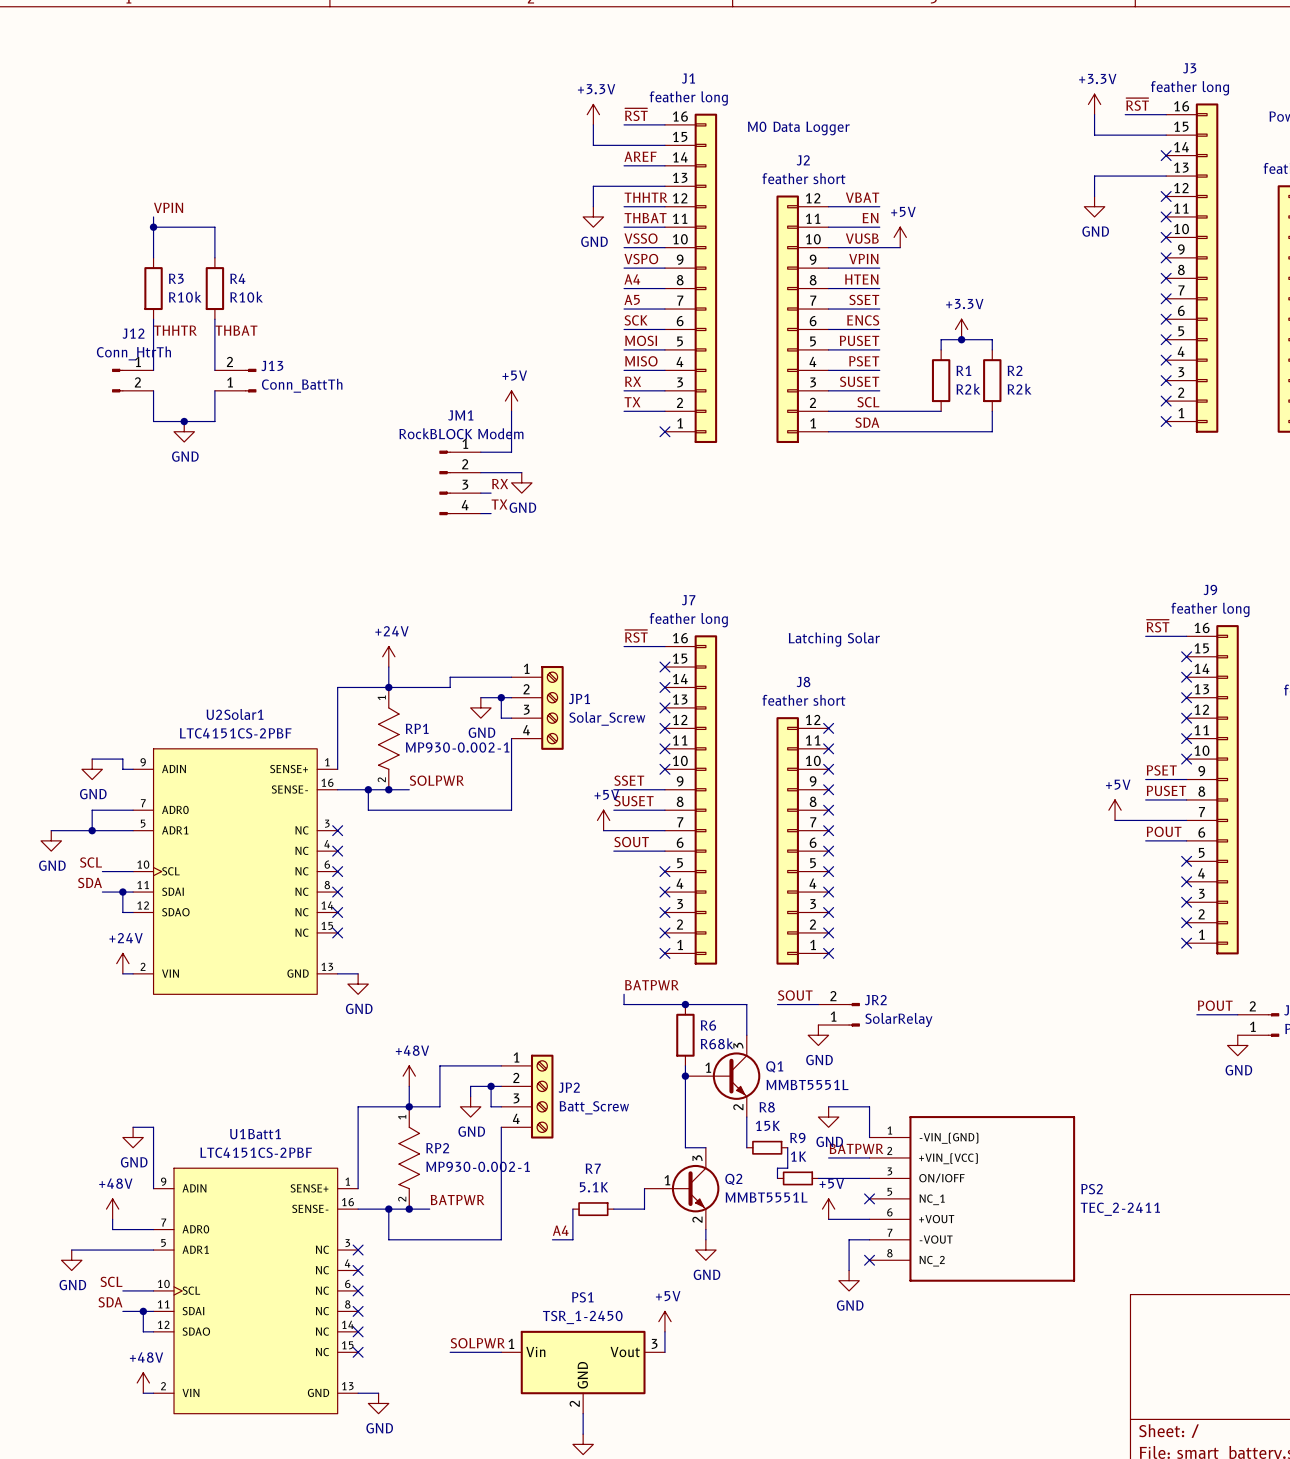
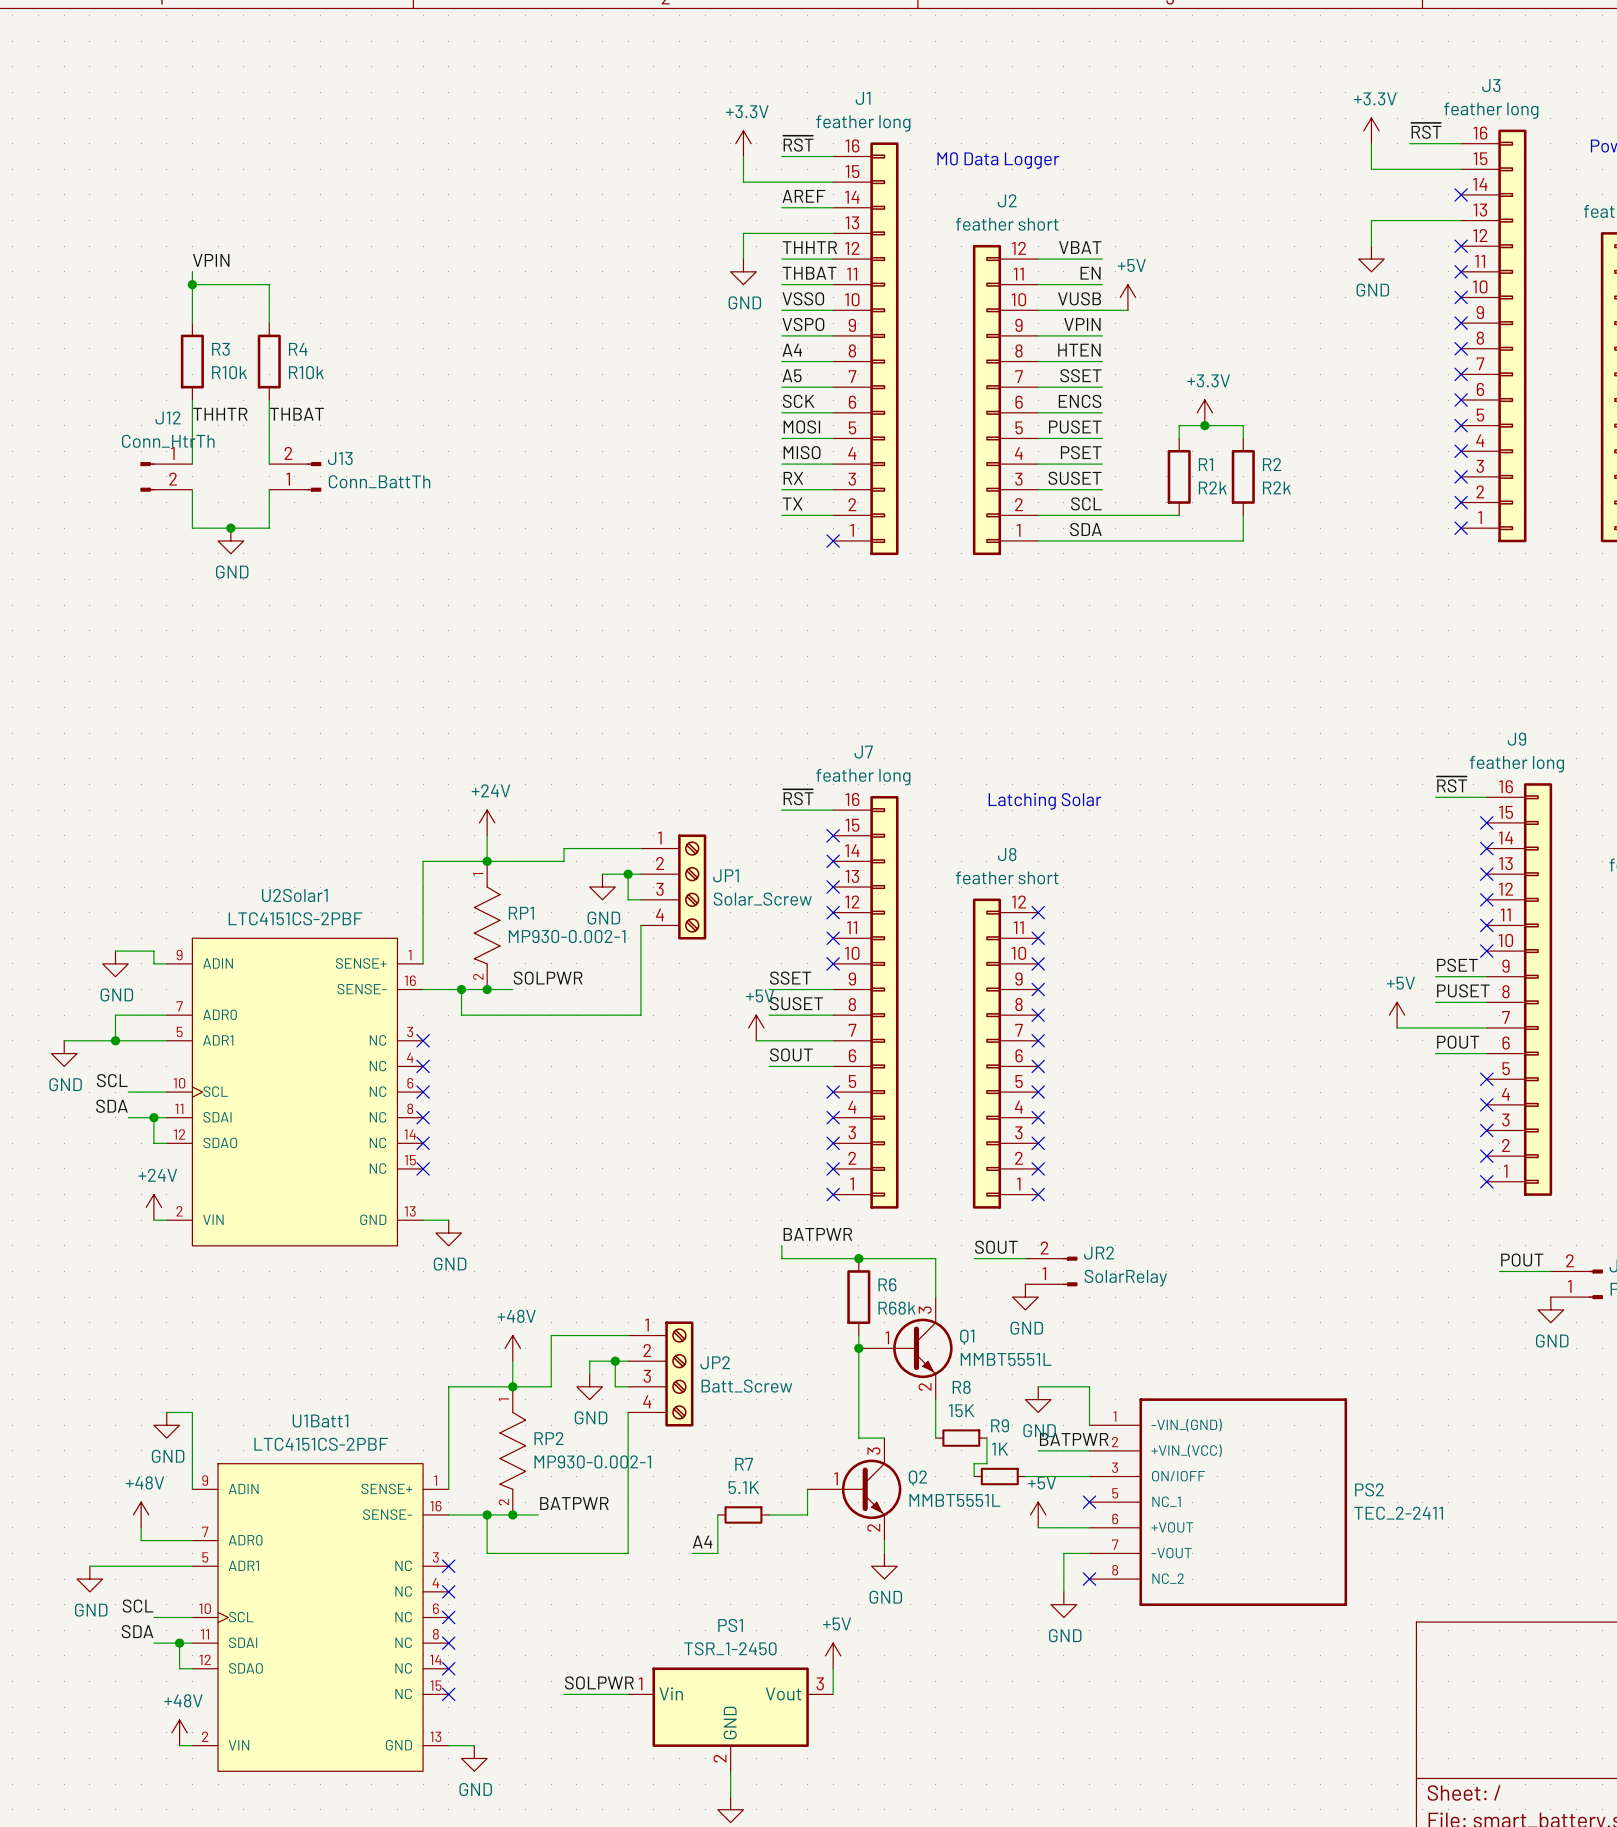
power symbol: +5V (511, 401) -> none
wire: (511, 411) (511, 452) (480, 452) -> none
wire: (480, 472) (521, 472) -> none
JM1: RockBLOCK Modem (460, 482) -> none
power symbol: GND (521, 482) -> none
label: RX (500, 484) -> none
wire: (480, 493) (491, 493) -> none
label: TX (499, 504) -> none
wire: (480, 513) (491, 513) -> none

